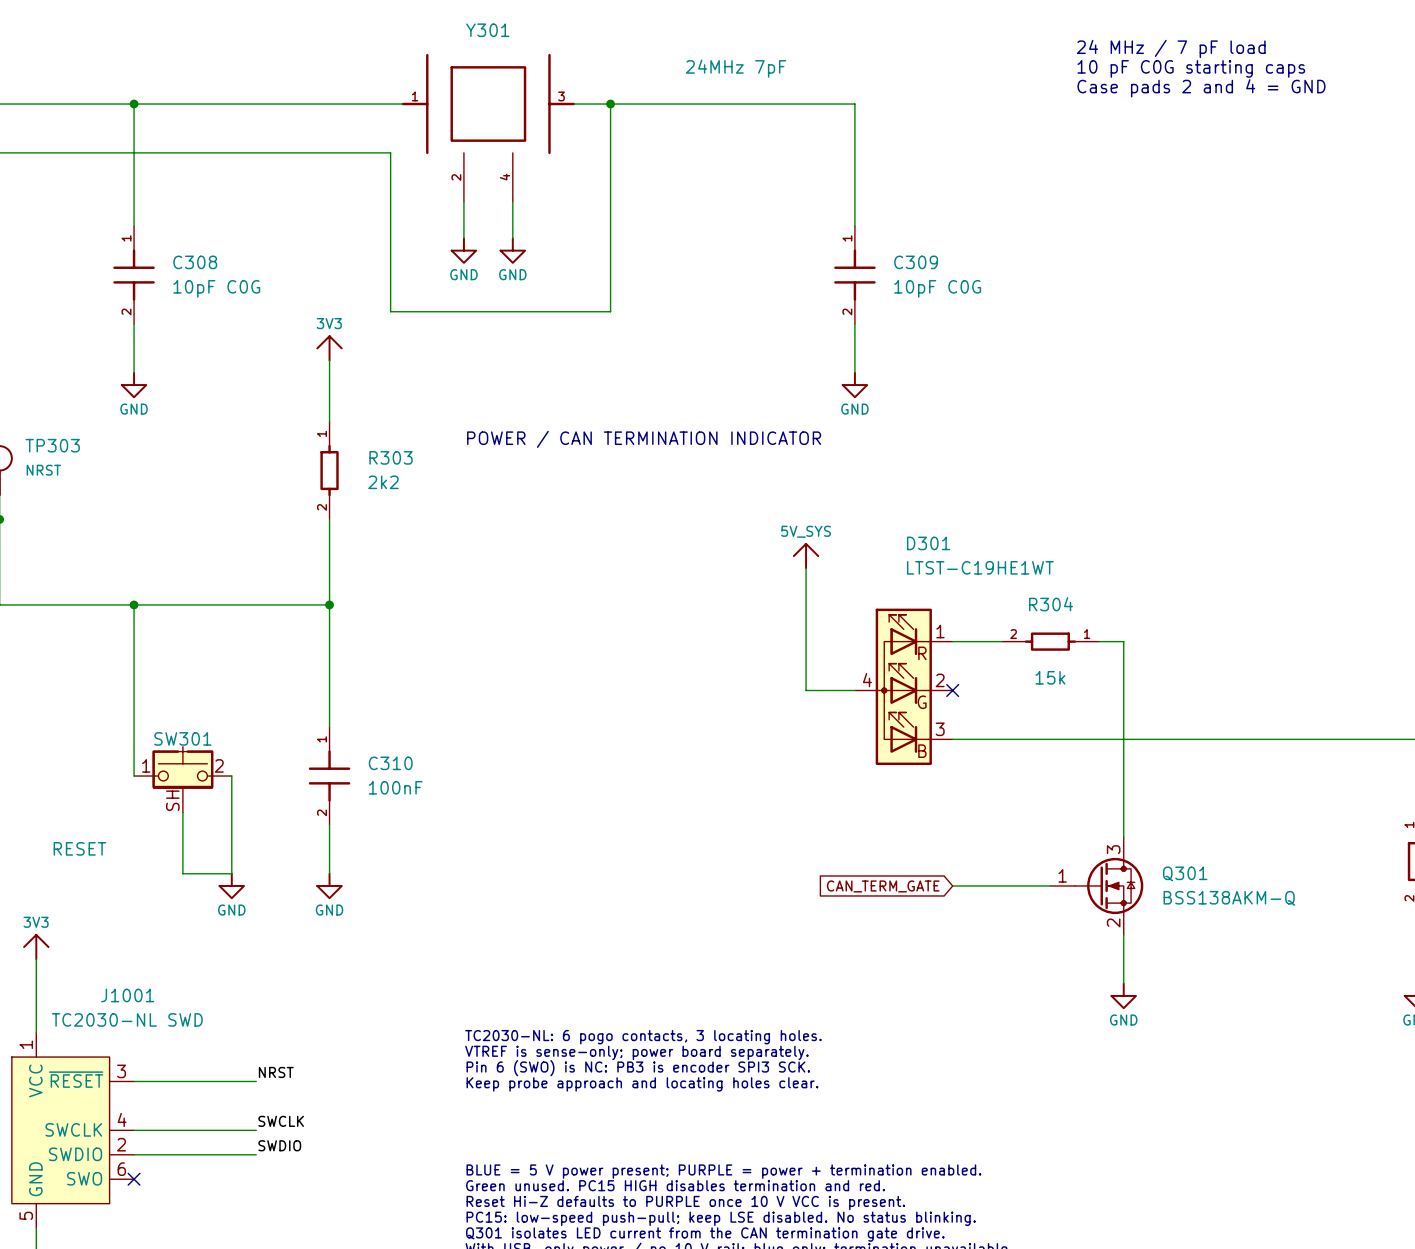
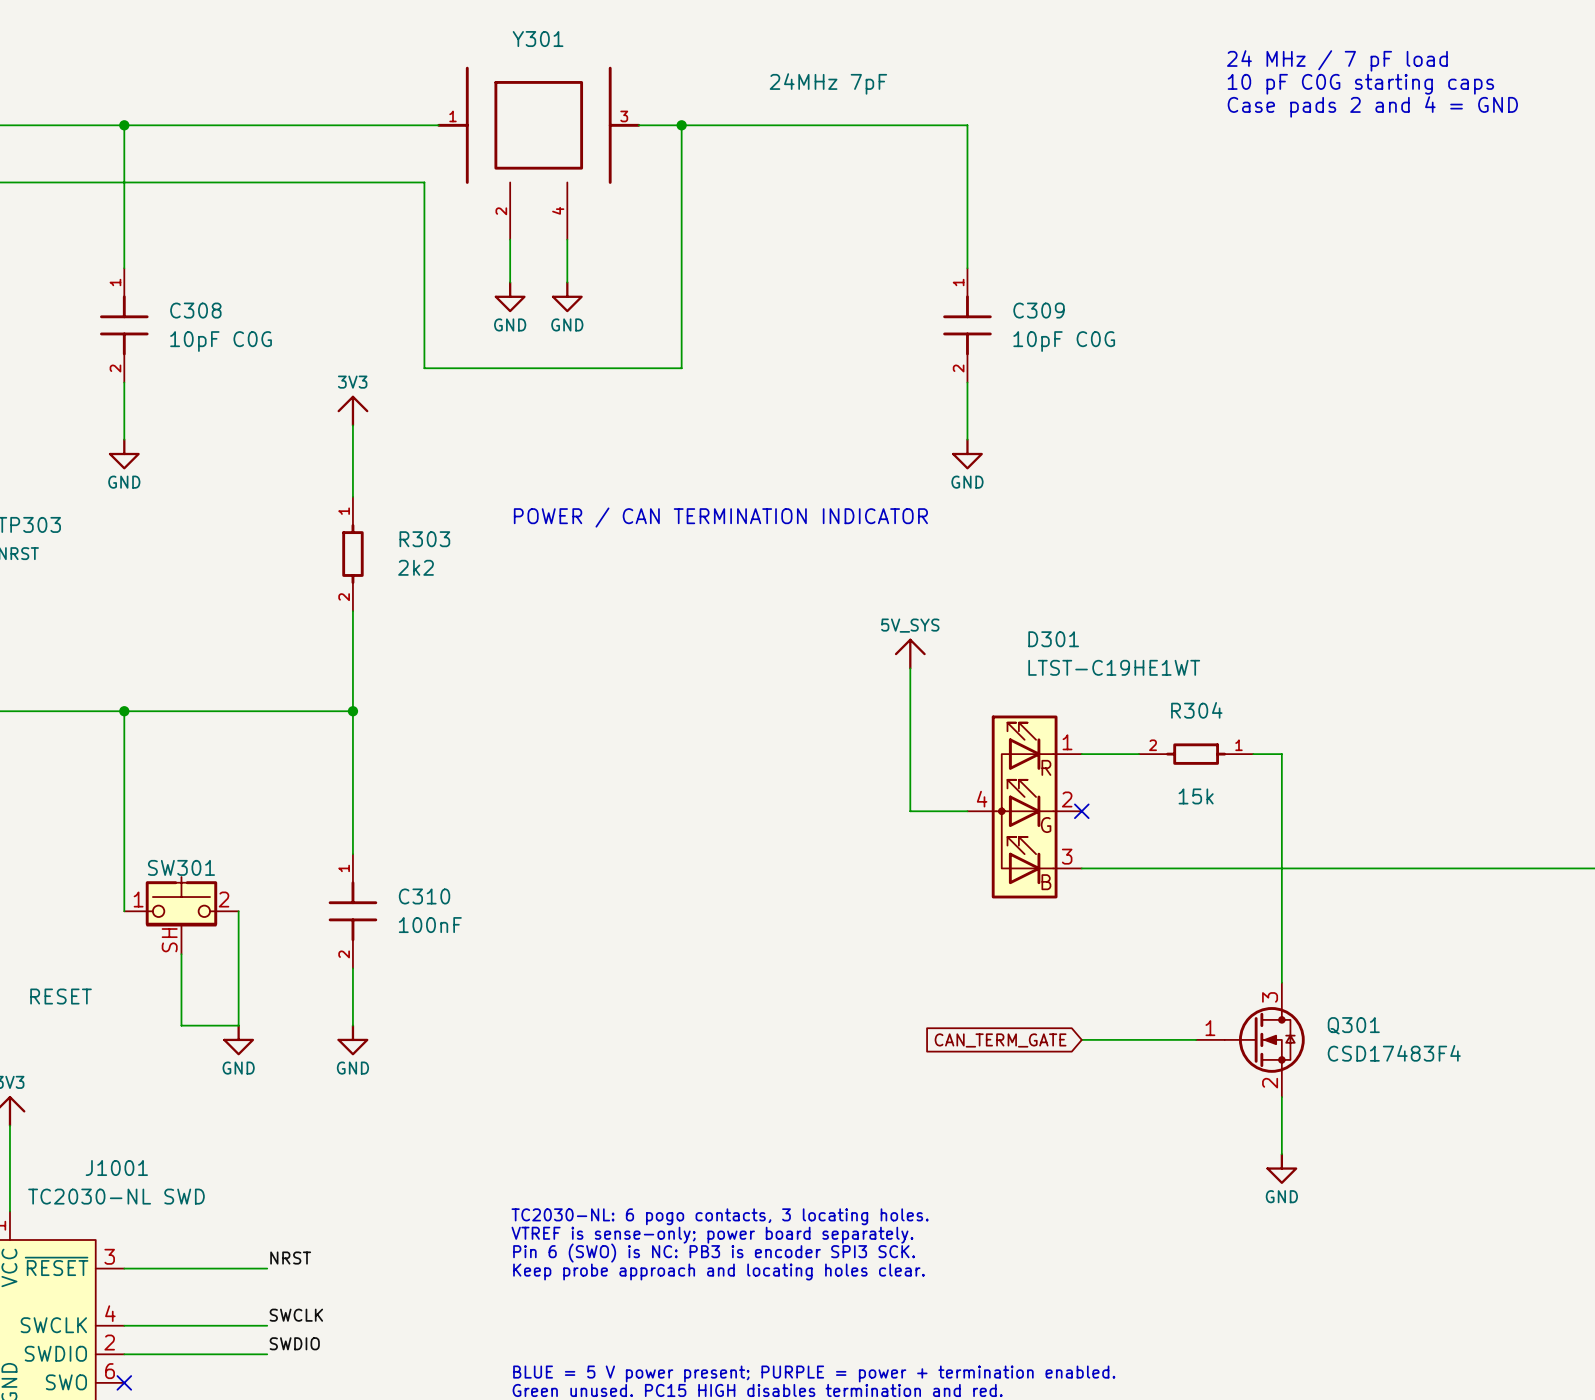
Q301 value: BSS138AKM-Q (1229, 898) -> CSD17483F4 (1394, 1053)

